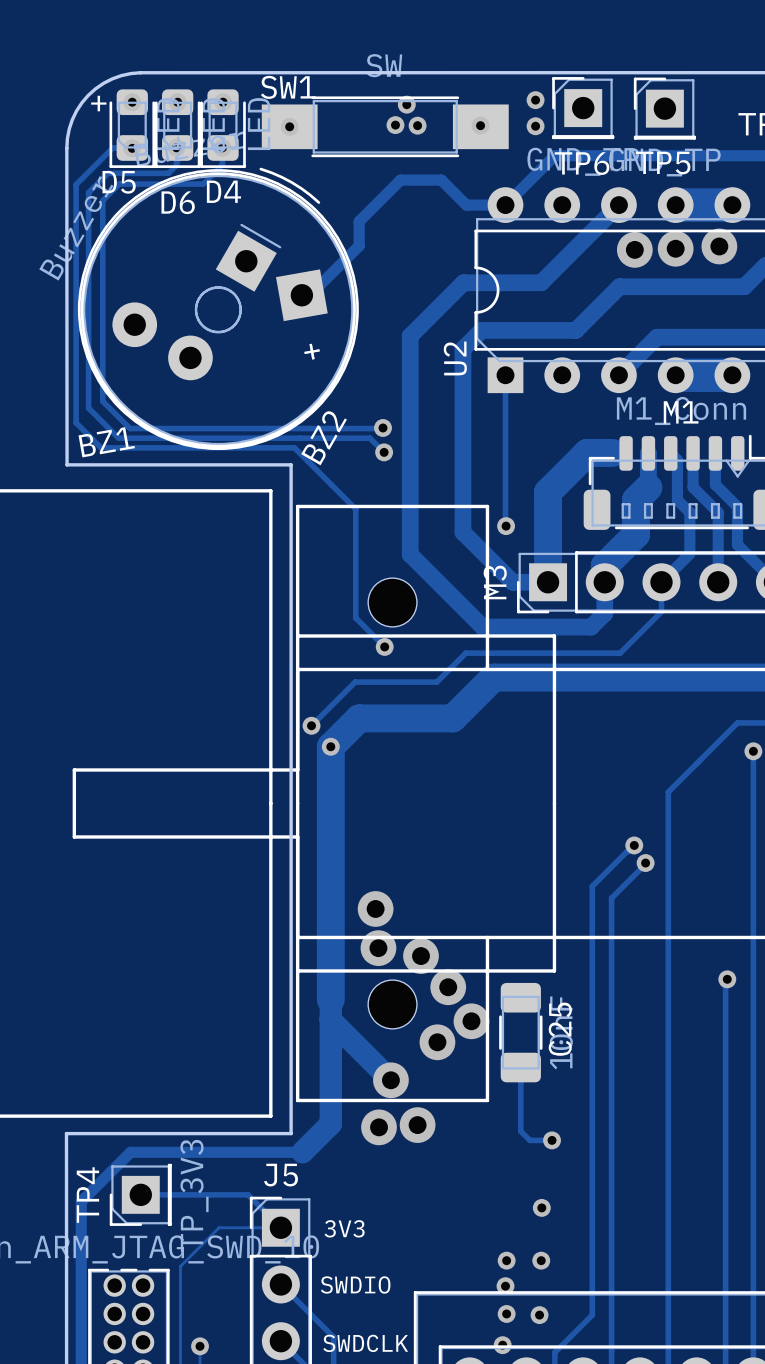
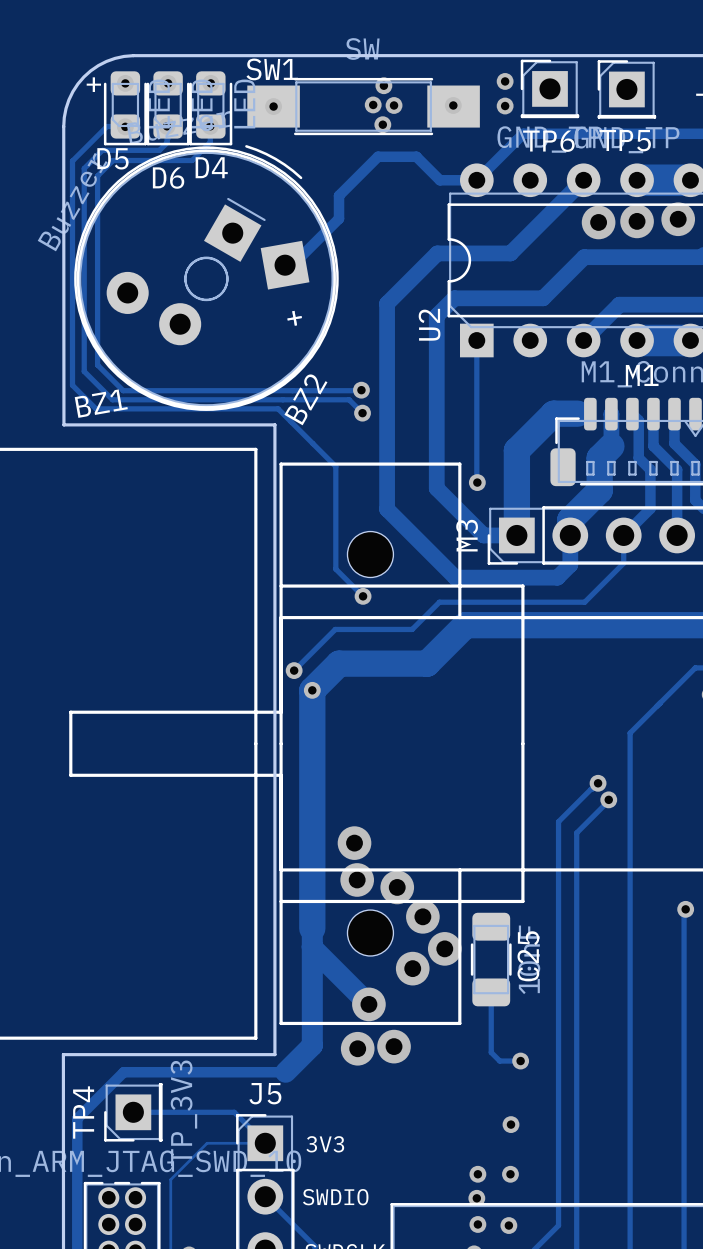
via: none -> (382, 124)

